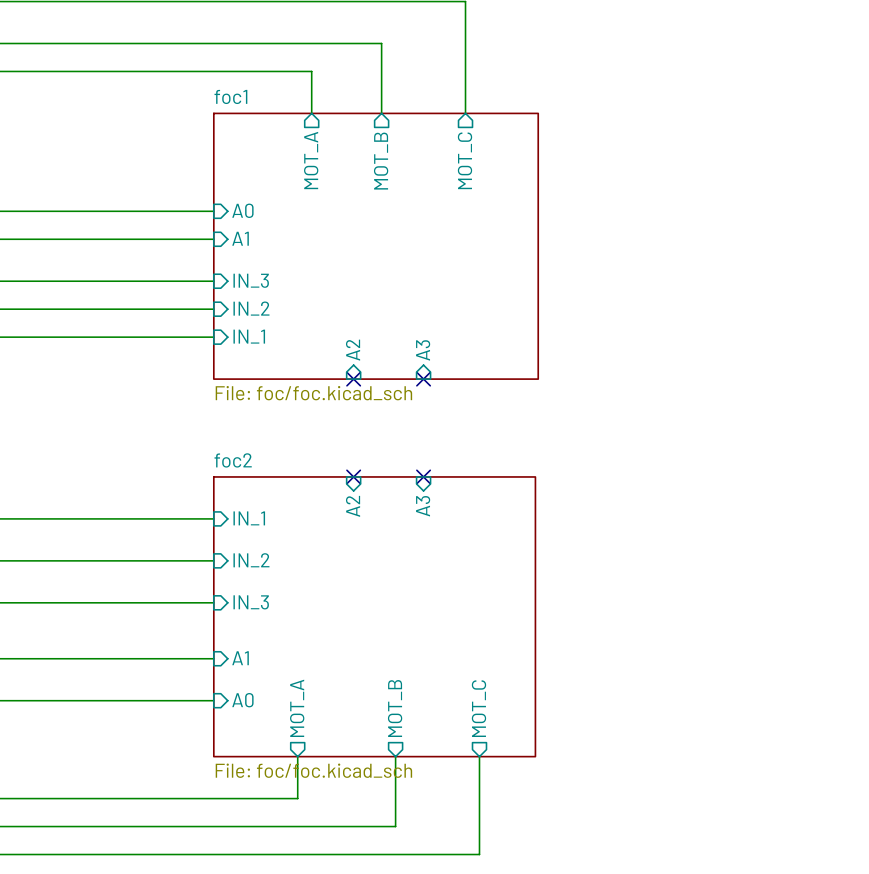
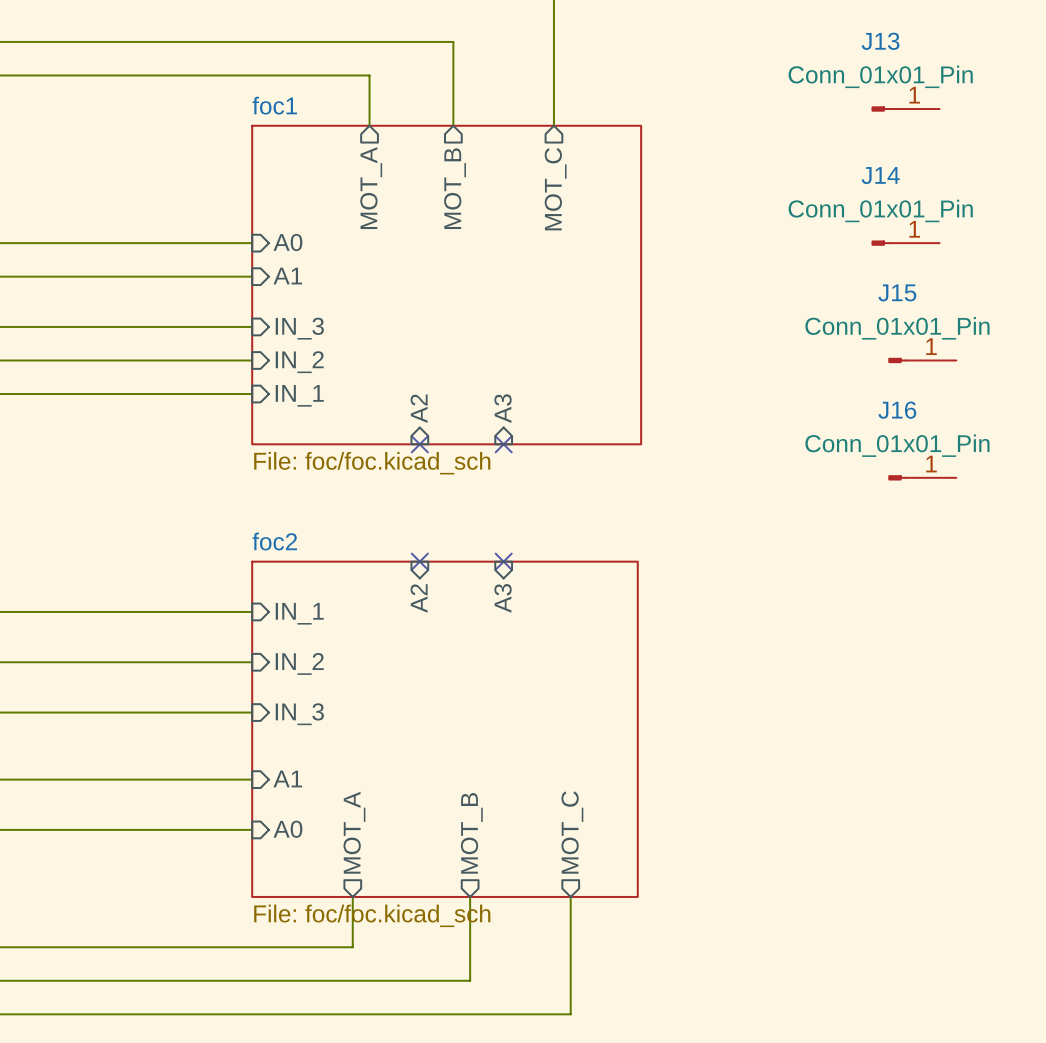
J13: none -> Conn_01x01_Pin (905, 109)
J14: none -> Conn_01x01_Pin (905, 243)
J15: none -> Conn_01x01_Pin (922, 360)
J16: none -> Conn_01x01_Pin (922, 477)

